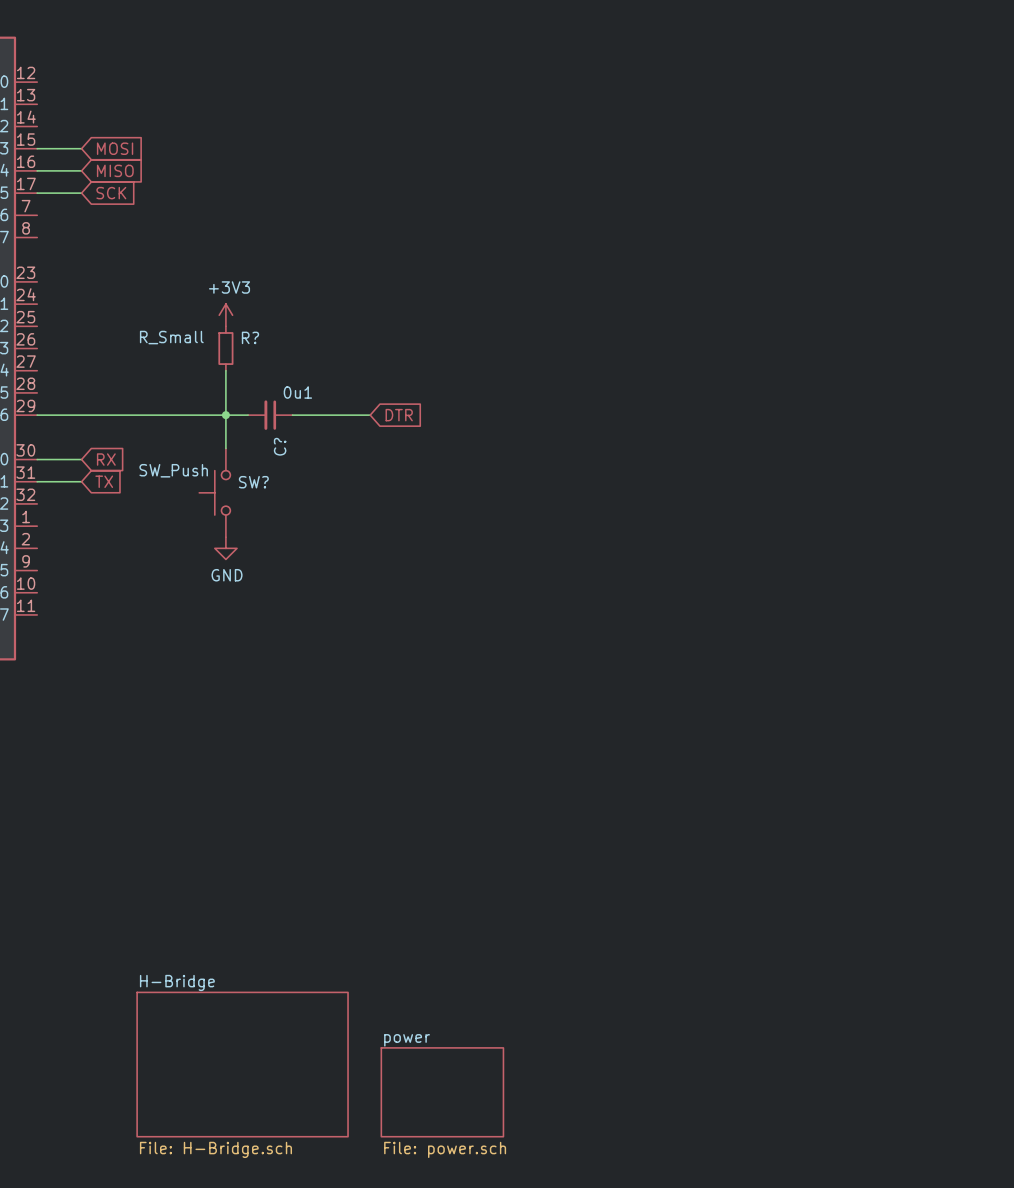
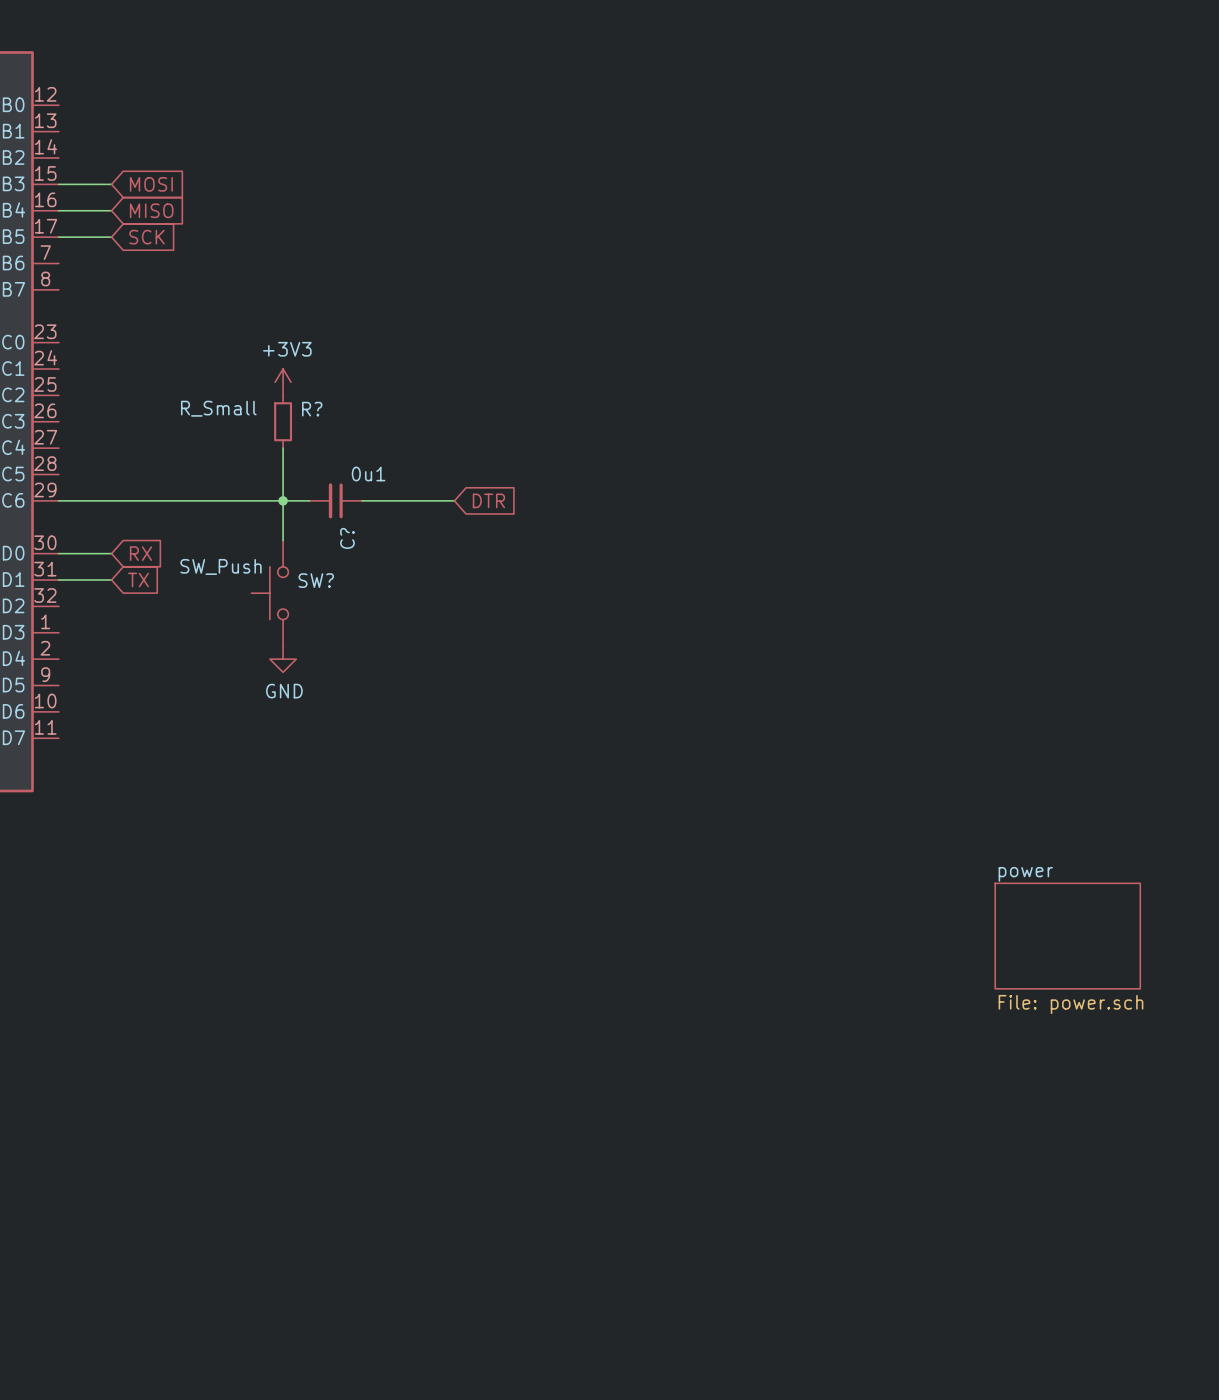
sheet power: none -> File: power.sch (1067, 936)
sheet H-Bridge: File: H-Bridge.sch (242, 1064) -> none
sheet power: File: power.sch (442, 1092) -> none

